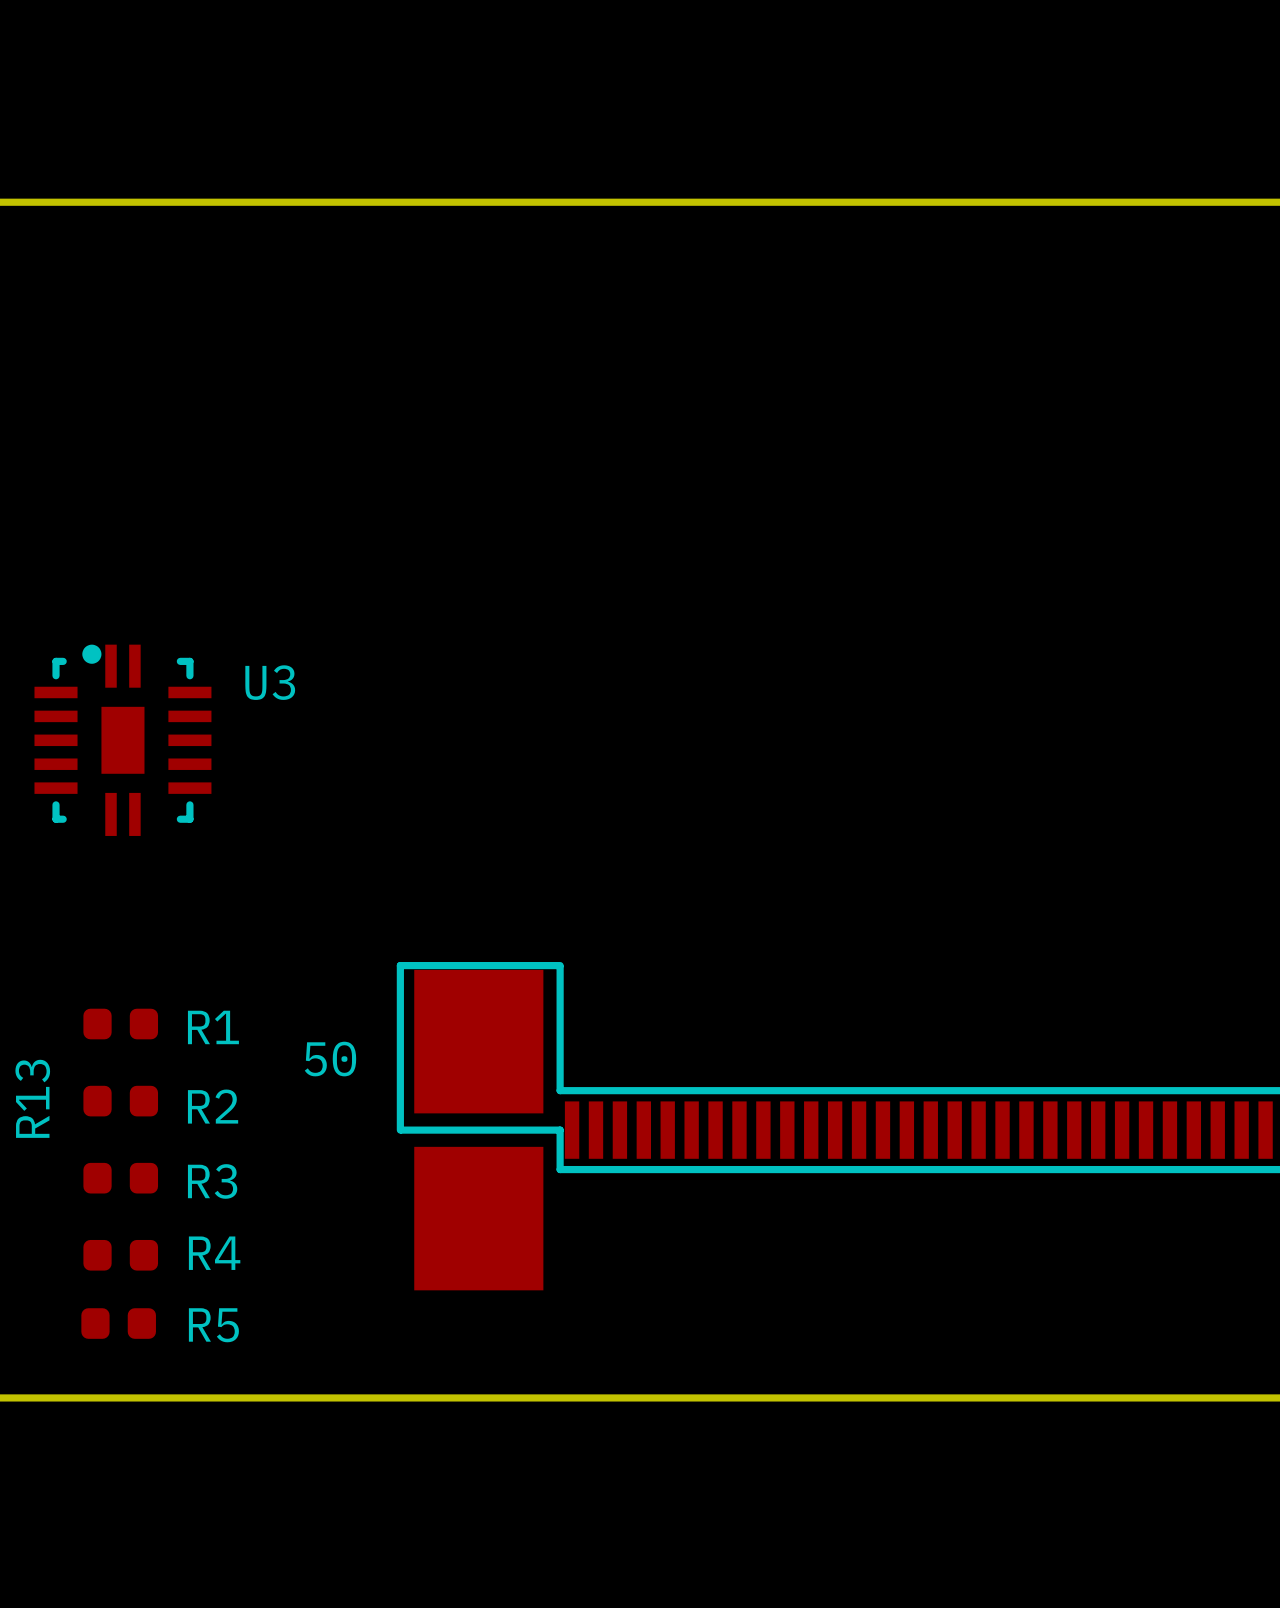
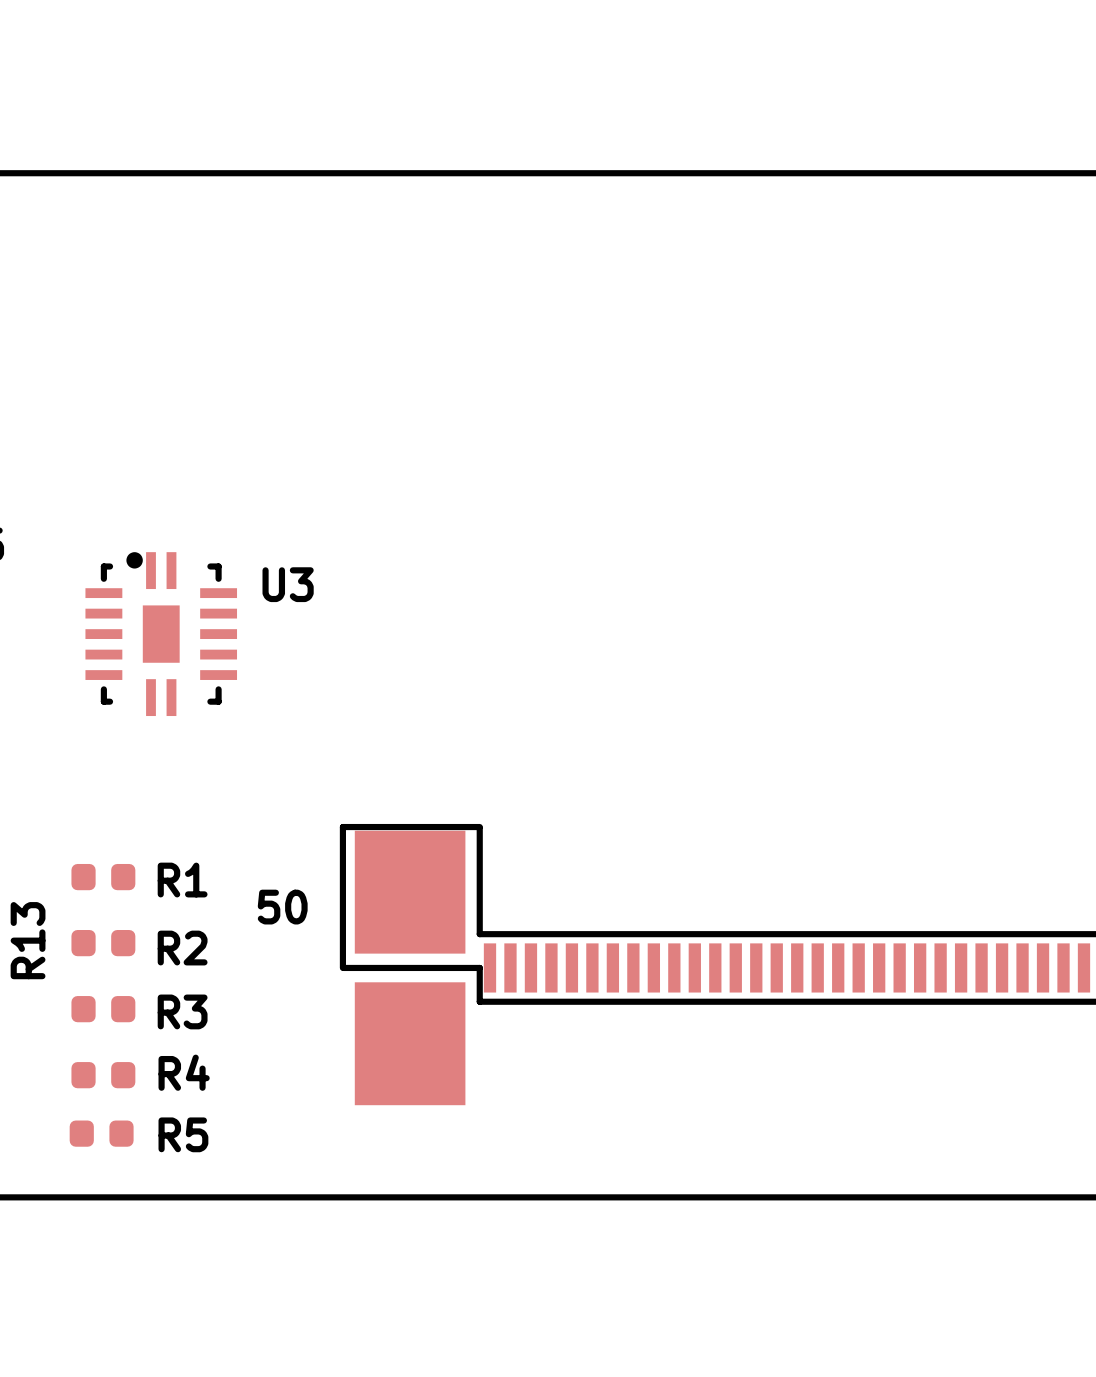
U3 position: (122, 740) -> (161, 634)

